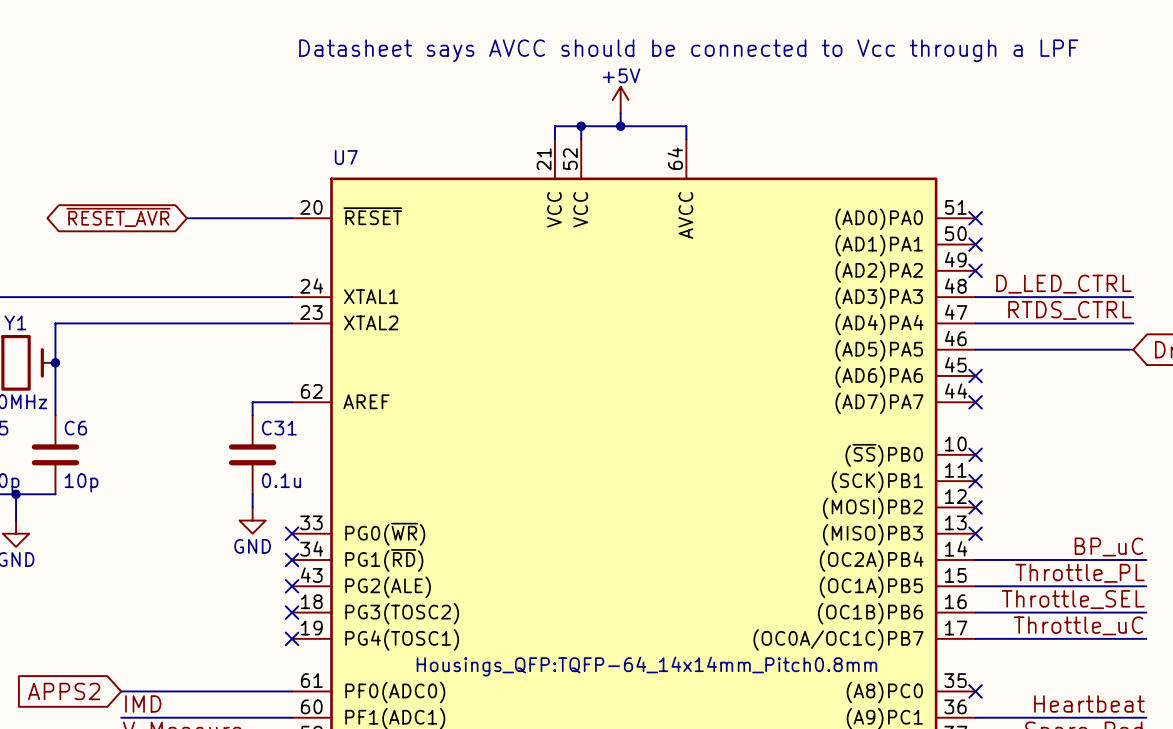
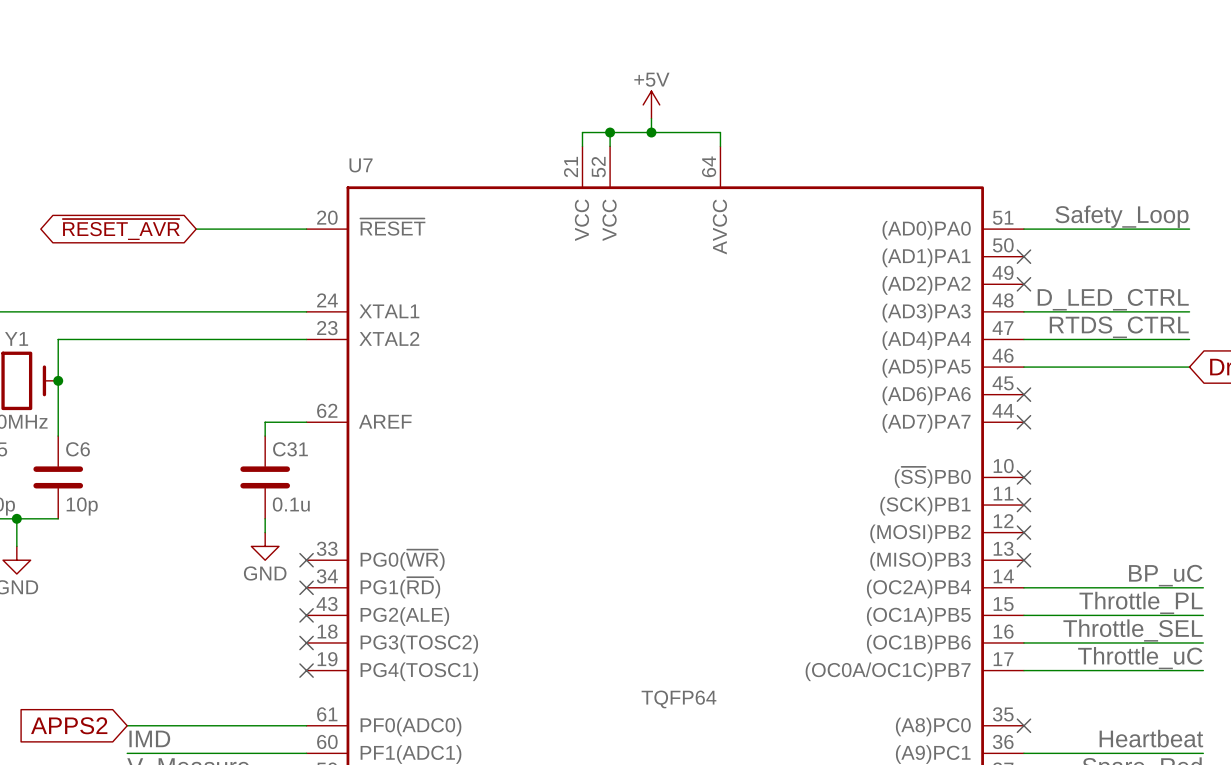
text: Datasheet says AVCC should be connected to Vcc through a LPF (688, 50) -> none
label: none -> Safety_Loop (1122, 216)
wire: none -> (1023, 229) (1189, 229)
no-connect mark: (975, 218) -> none
U7 text: Housings_QFP:TQFP-64_14x14mm_Pitch0.8mm (646, 666) -> TQFP64 (678, 699)

